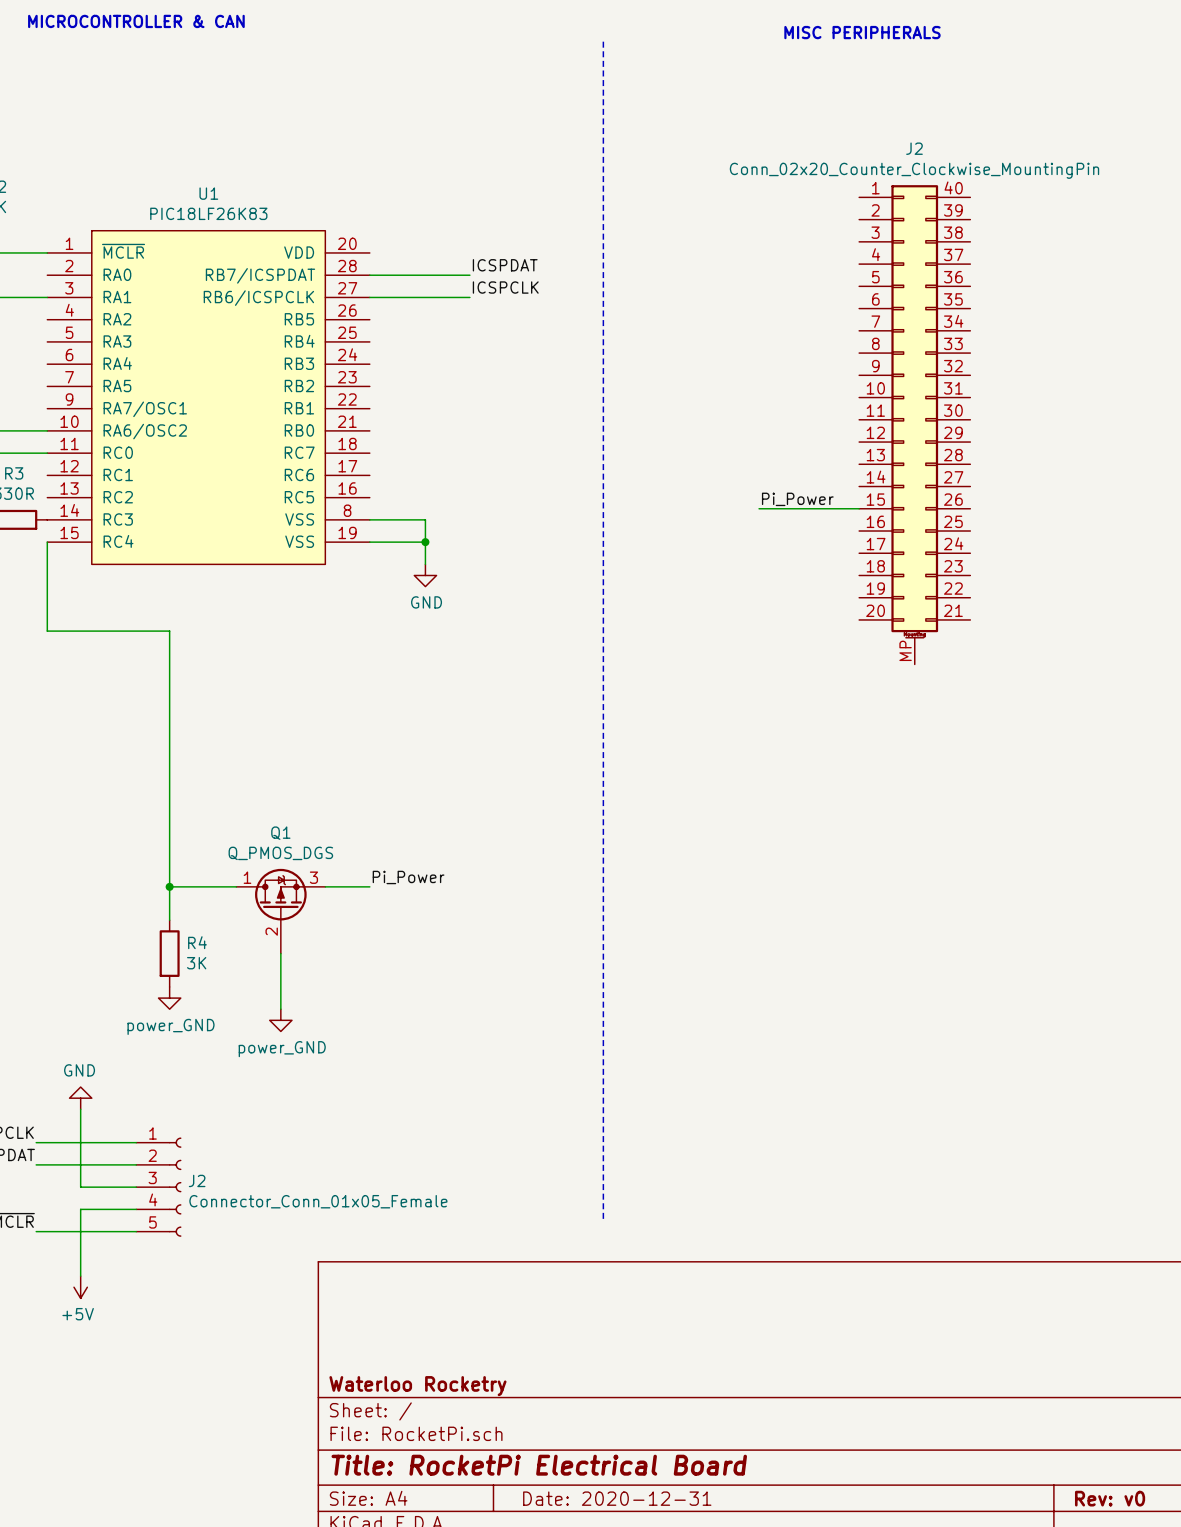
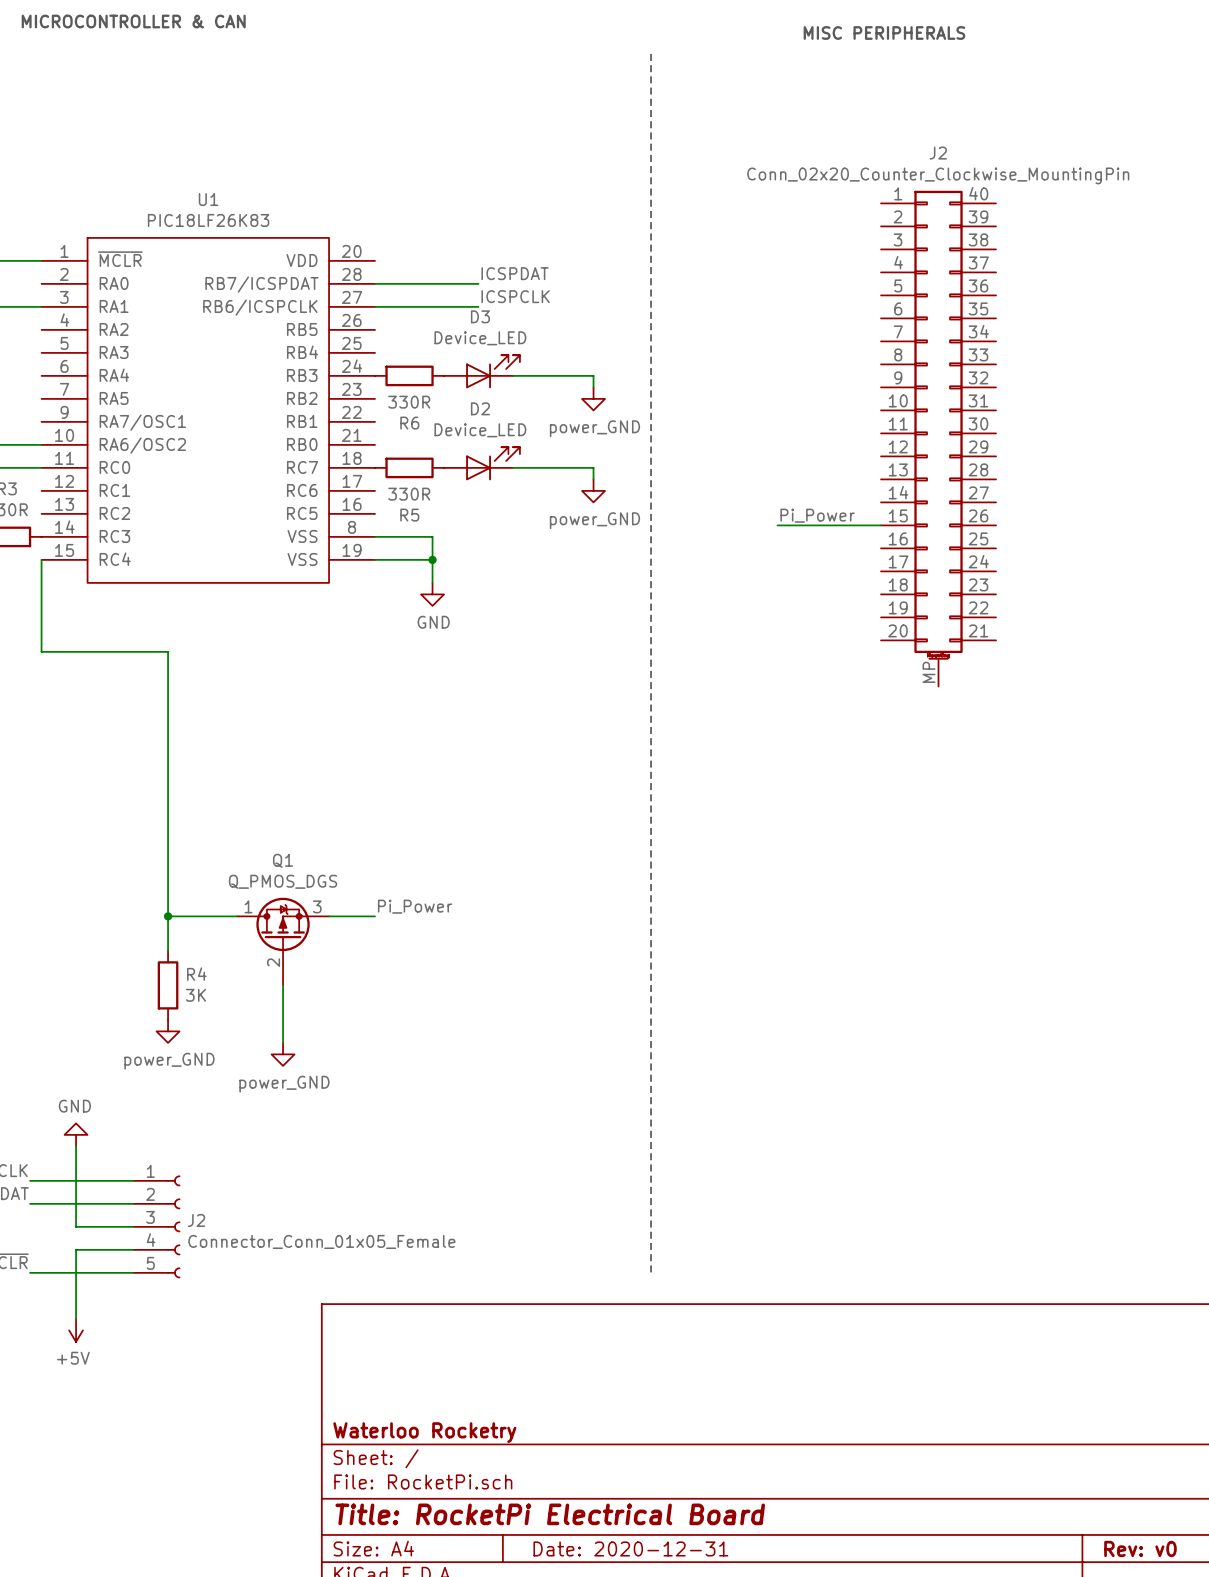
line: (603, 41) (603, 1220) -> (651, 53) (651, 1272)
D3: none -> Device_LED (481, 371)
R6: none -> 330R (409, 375)
wire: none -> (513, 375) (593, 375) (593, 387)
power symbol: none -> power_GND (593, 398)
D2: none -> Device_LED (481, 463)
R5: none -> 330R (409, 467)
wire: none -> (513, 467) (593, 467) (593, 479)
power symbol: none -> power_GND (593, 490)

